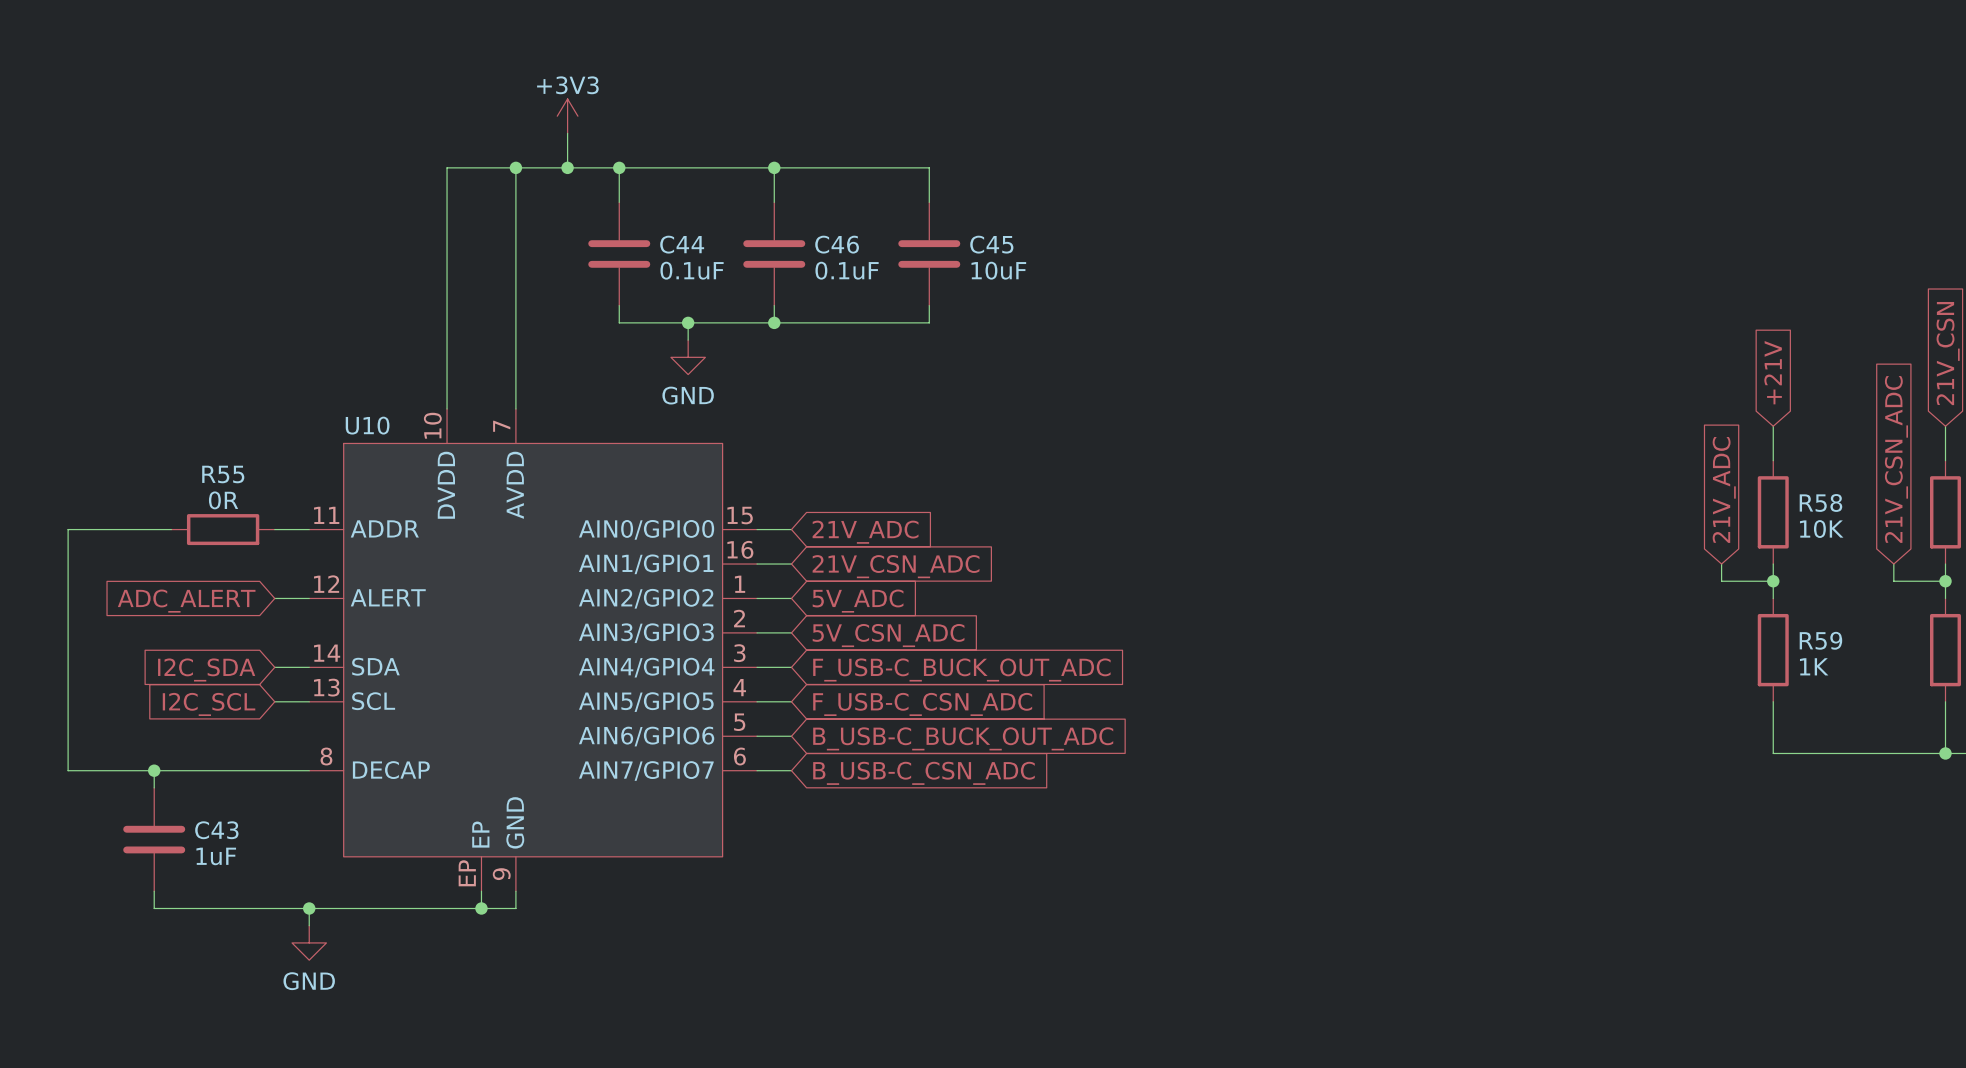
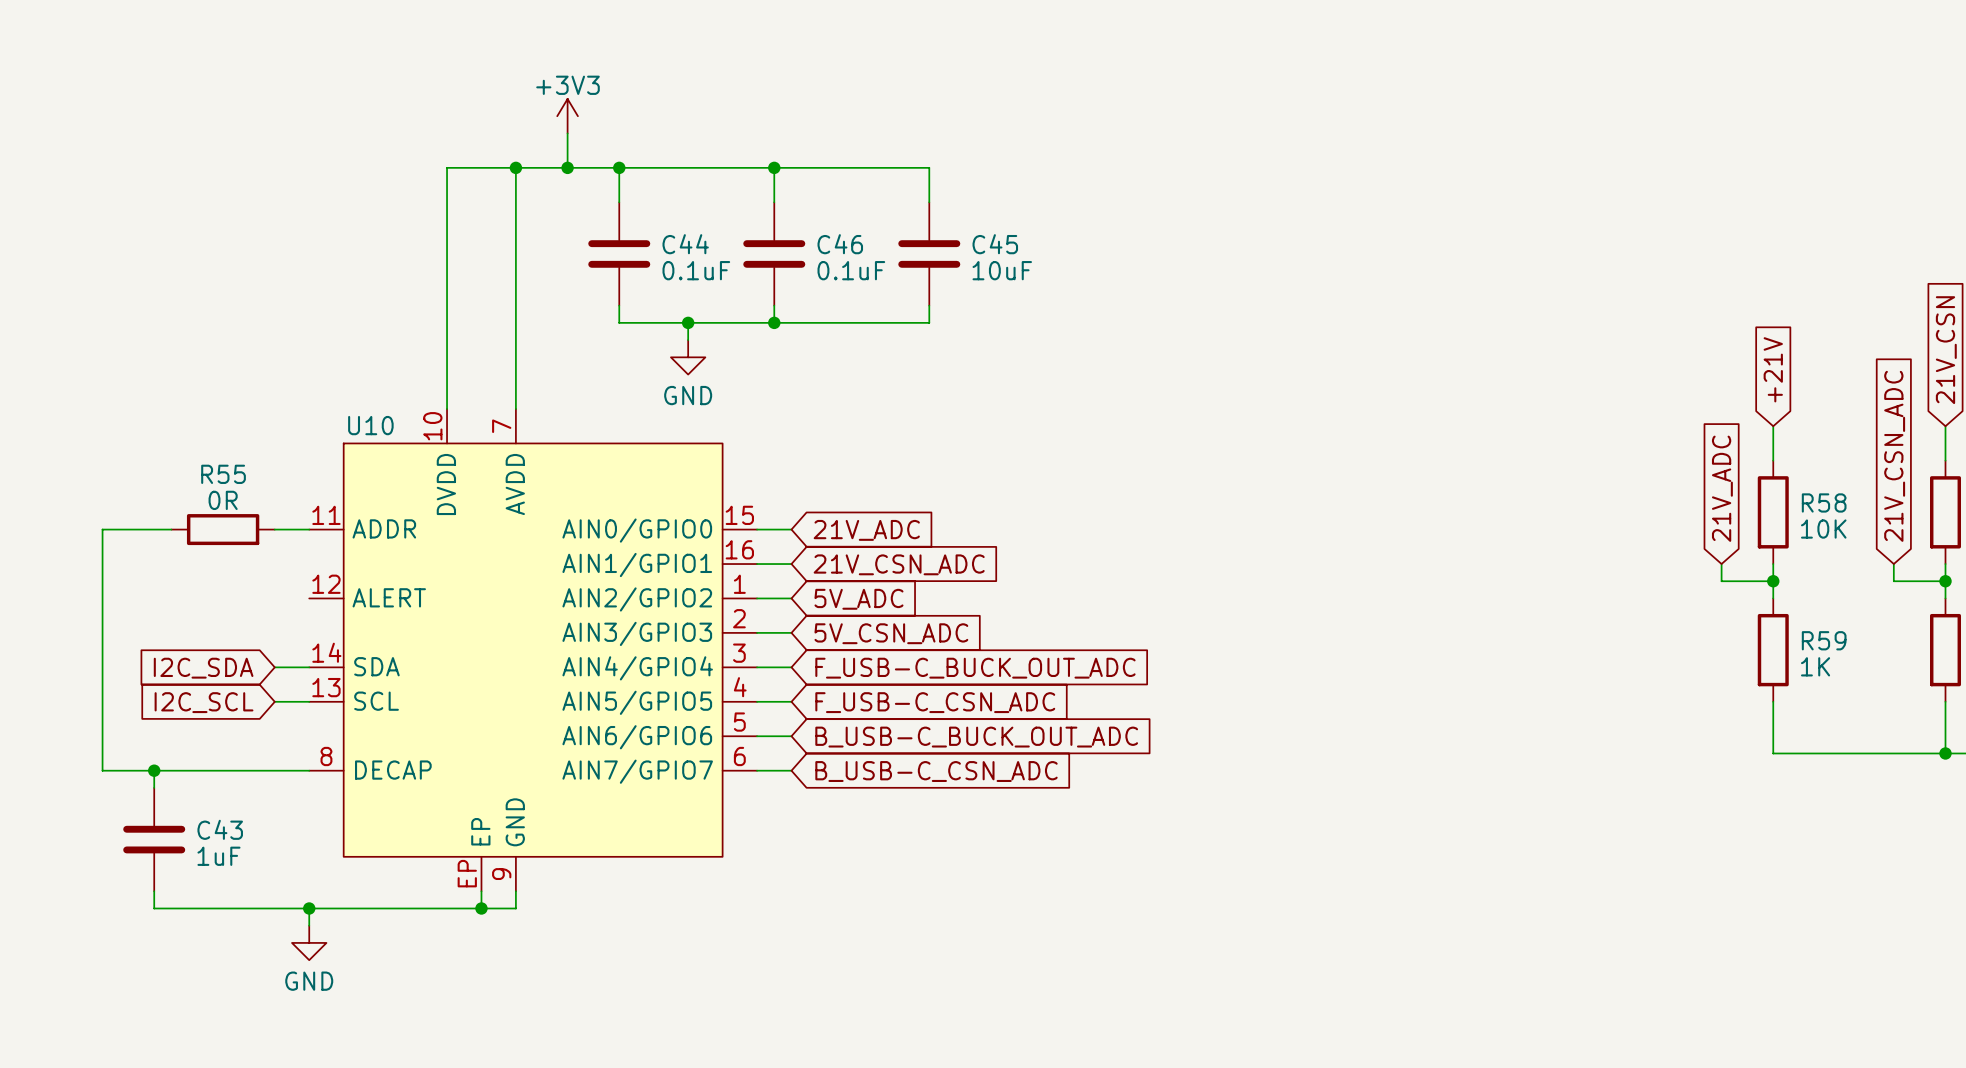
wire: (102, 529) (68, 529) (68, 770) (102, 770) -> (102, 529) (102, 770)
wire: (274, 598) (309, 598) -> none
global label: ADC_ALERT (186, 601) -> none

